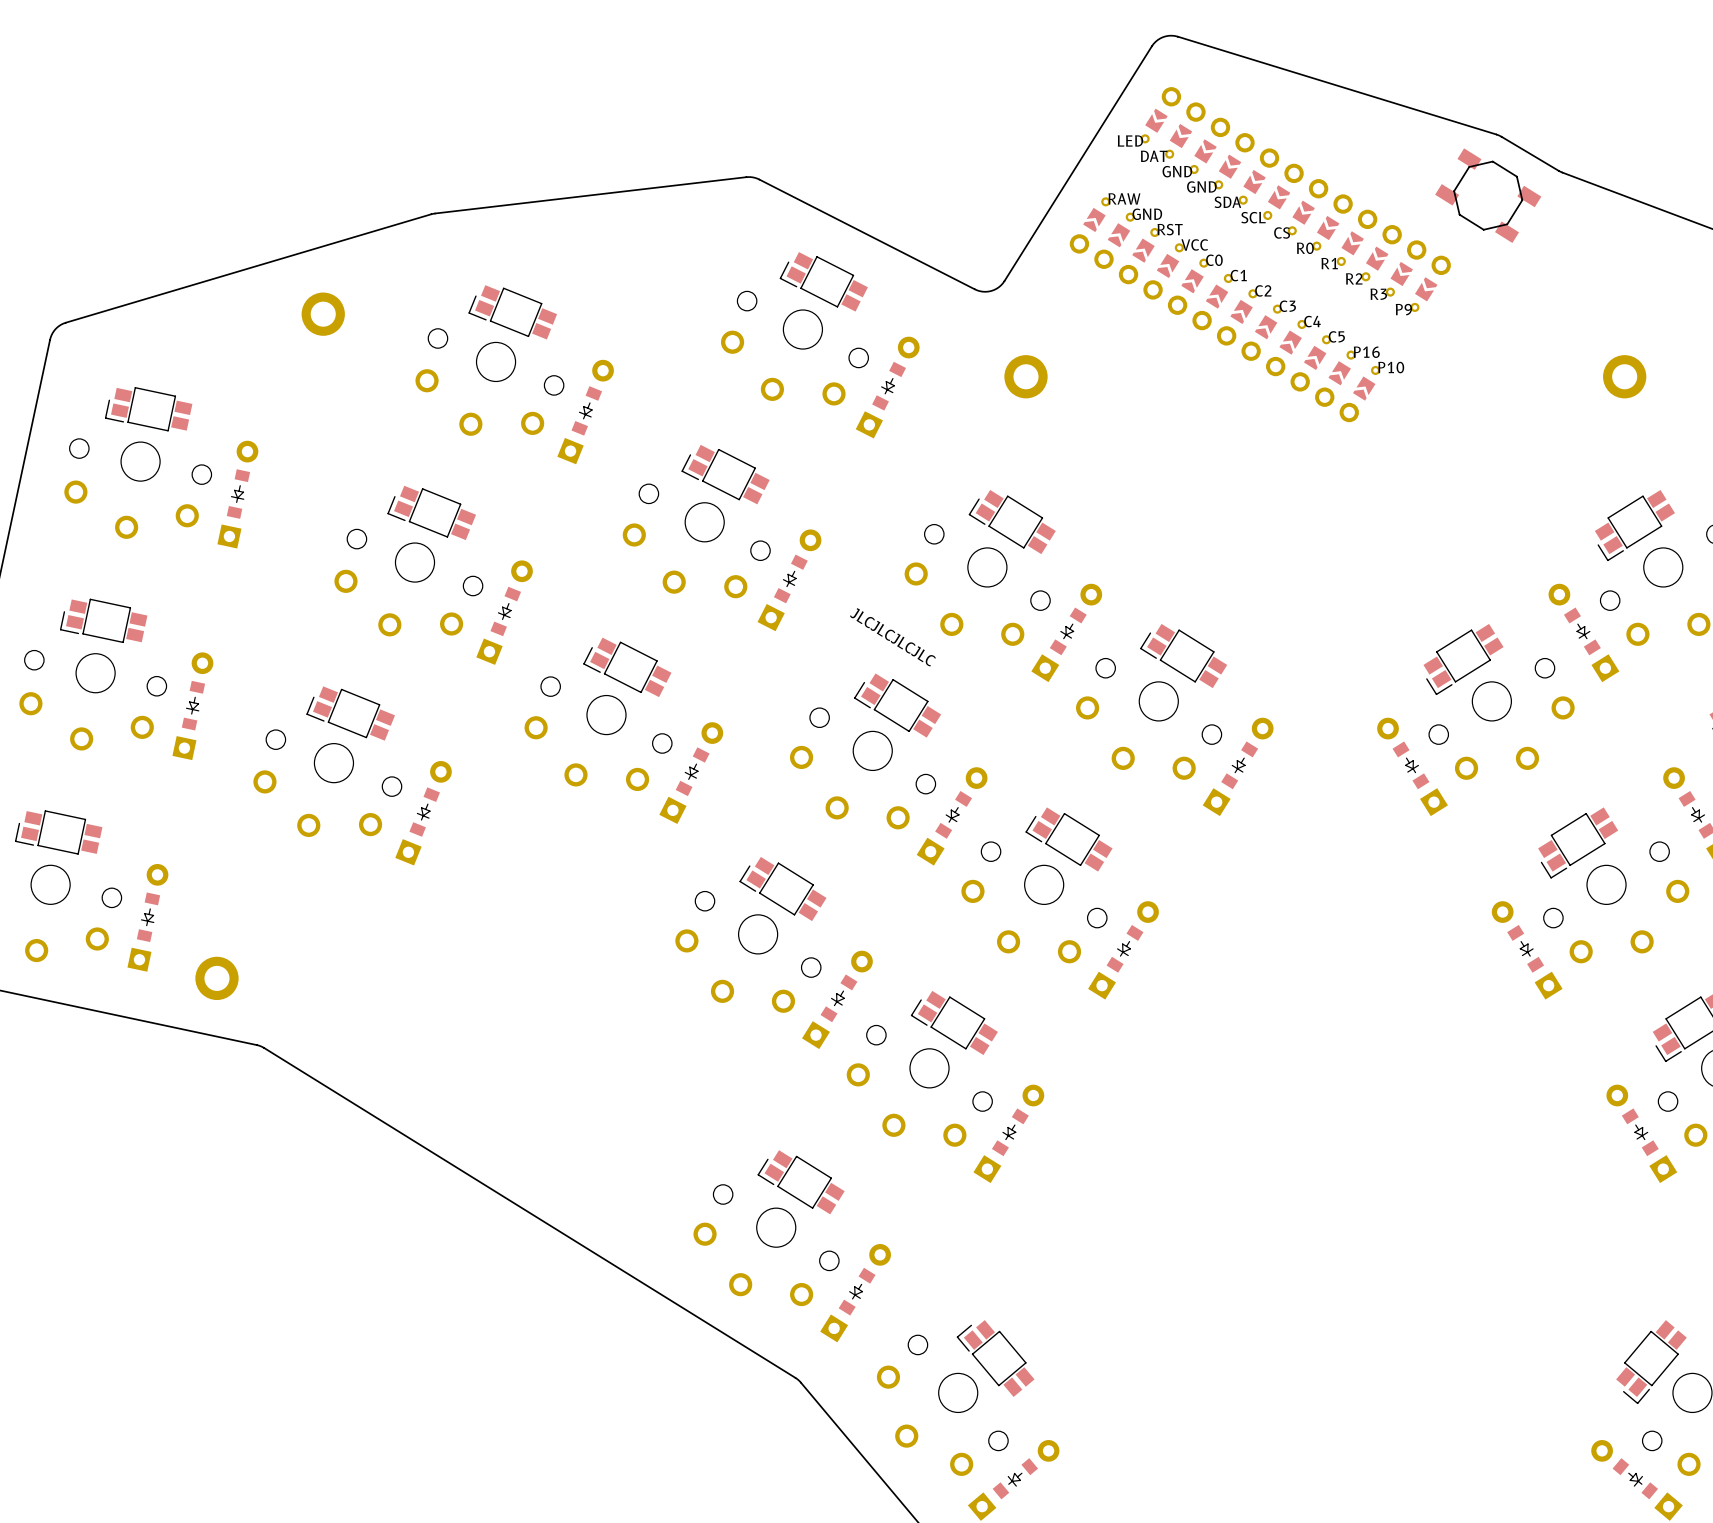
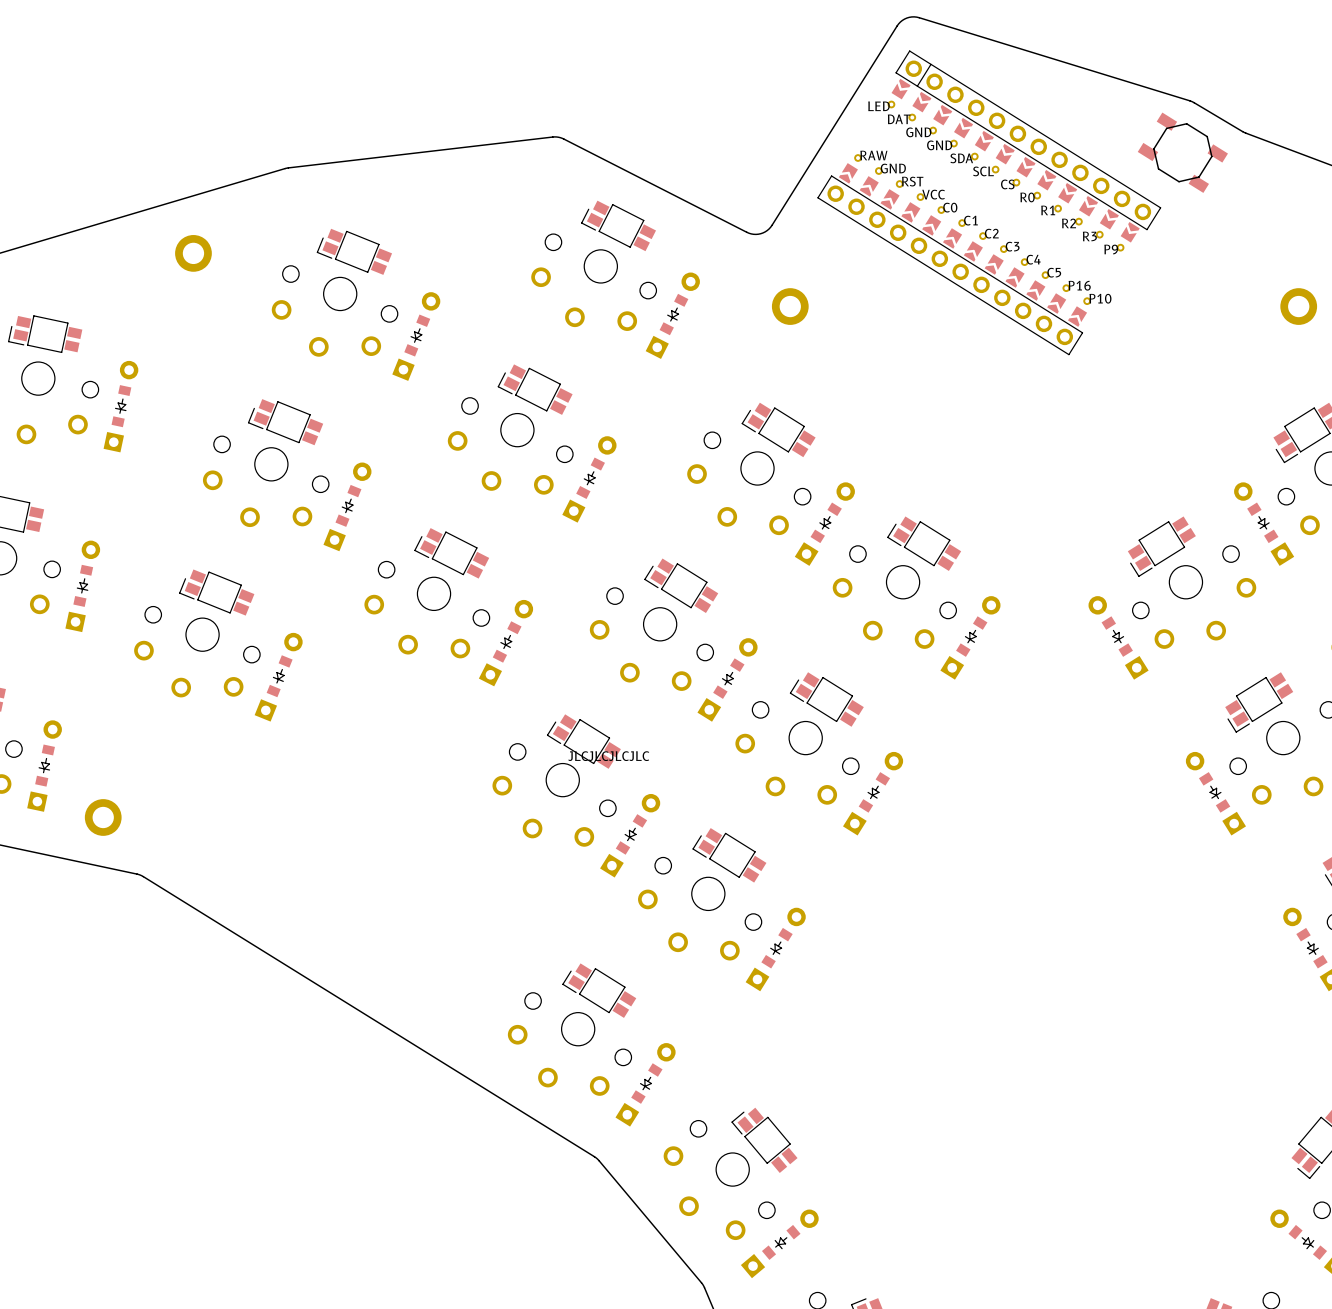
part footprint: [1069, 87, 1451, 423] -> [817, 50, 1162, 356]
text rotation: 0° (892, 637) -> 32° counterclockwise (608, 756)
text position: JLCJLCJLCJLC (892, 637) -> JLCJLCJLCJLC (608, 756)

